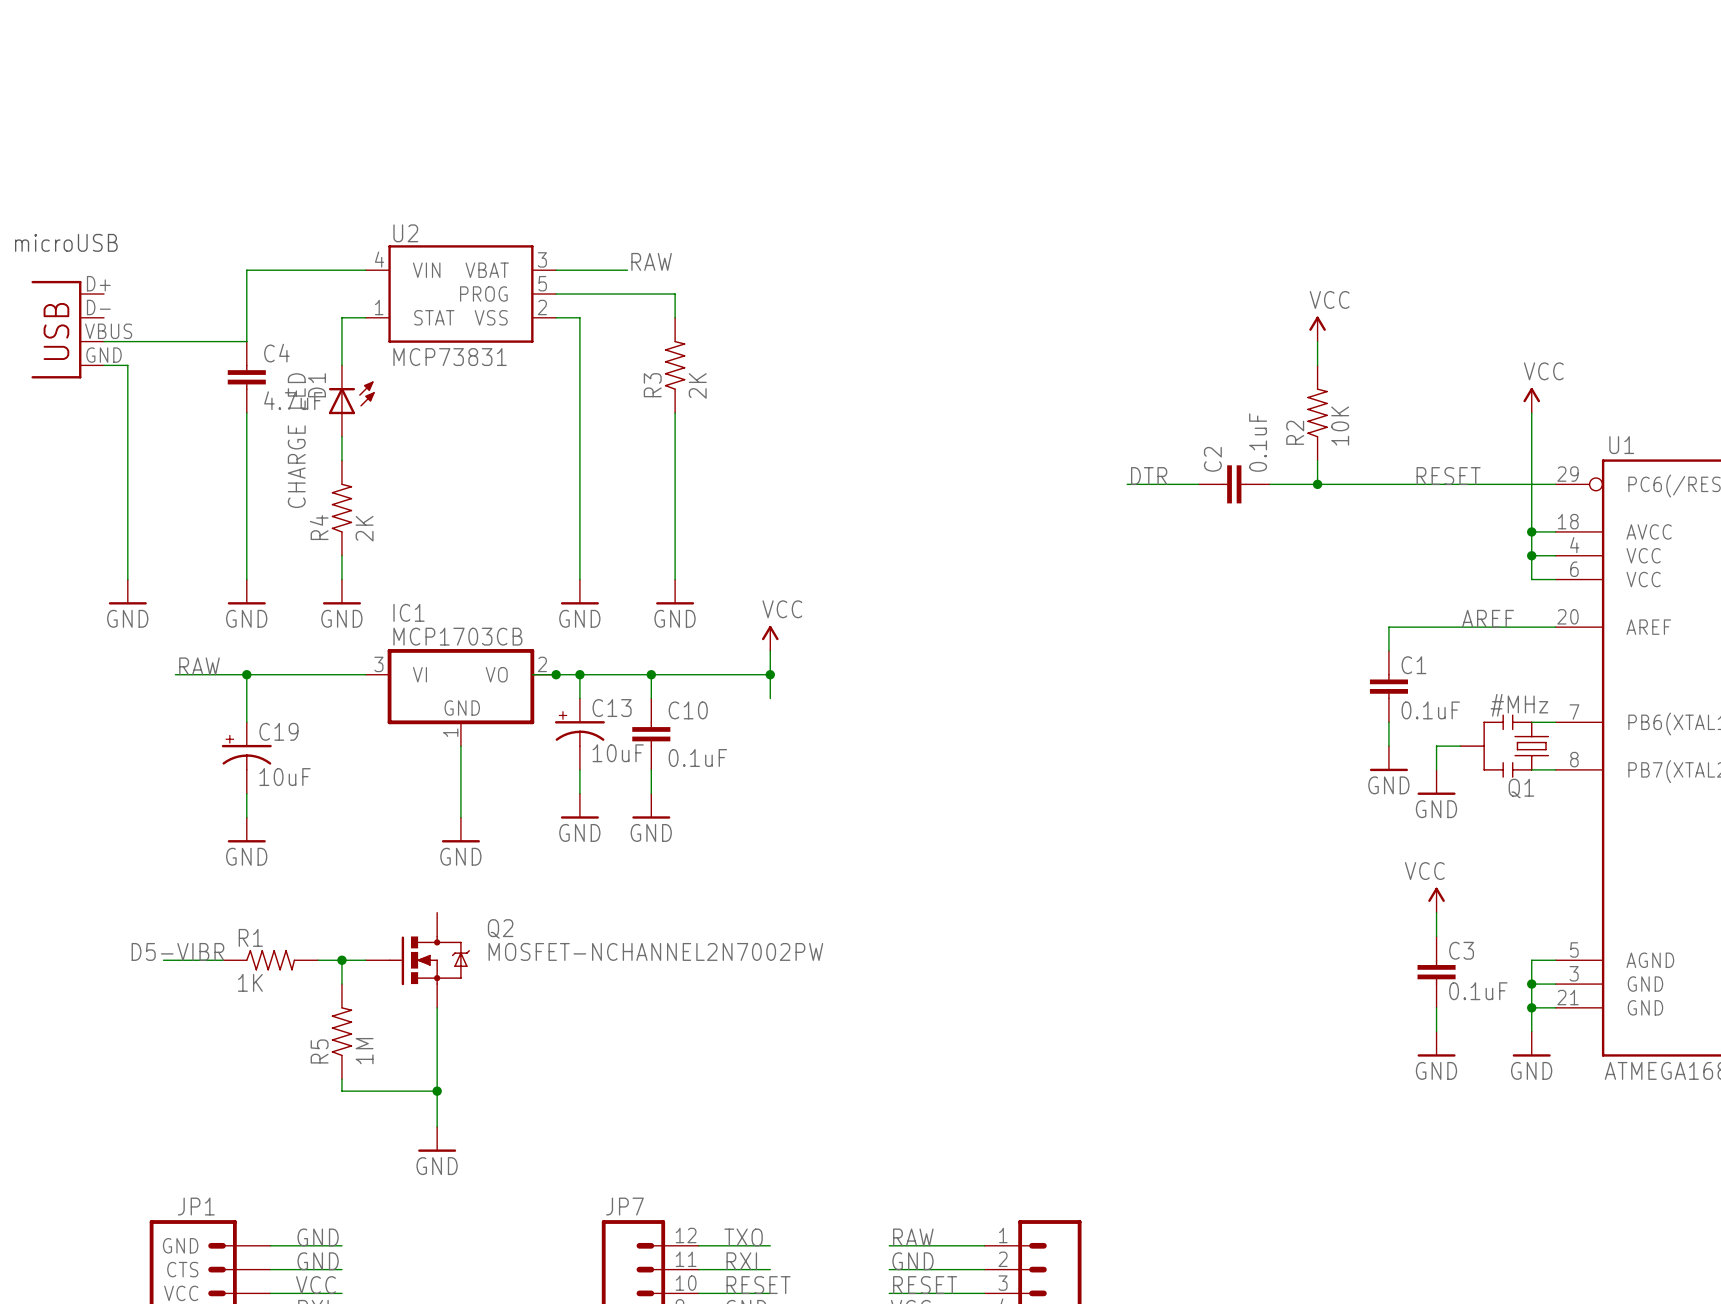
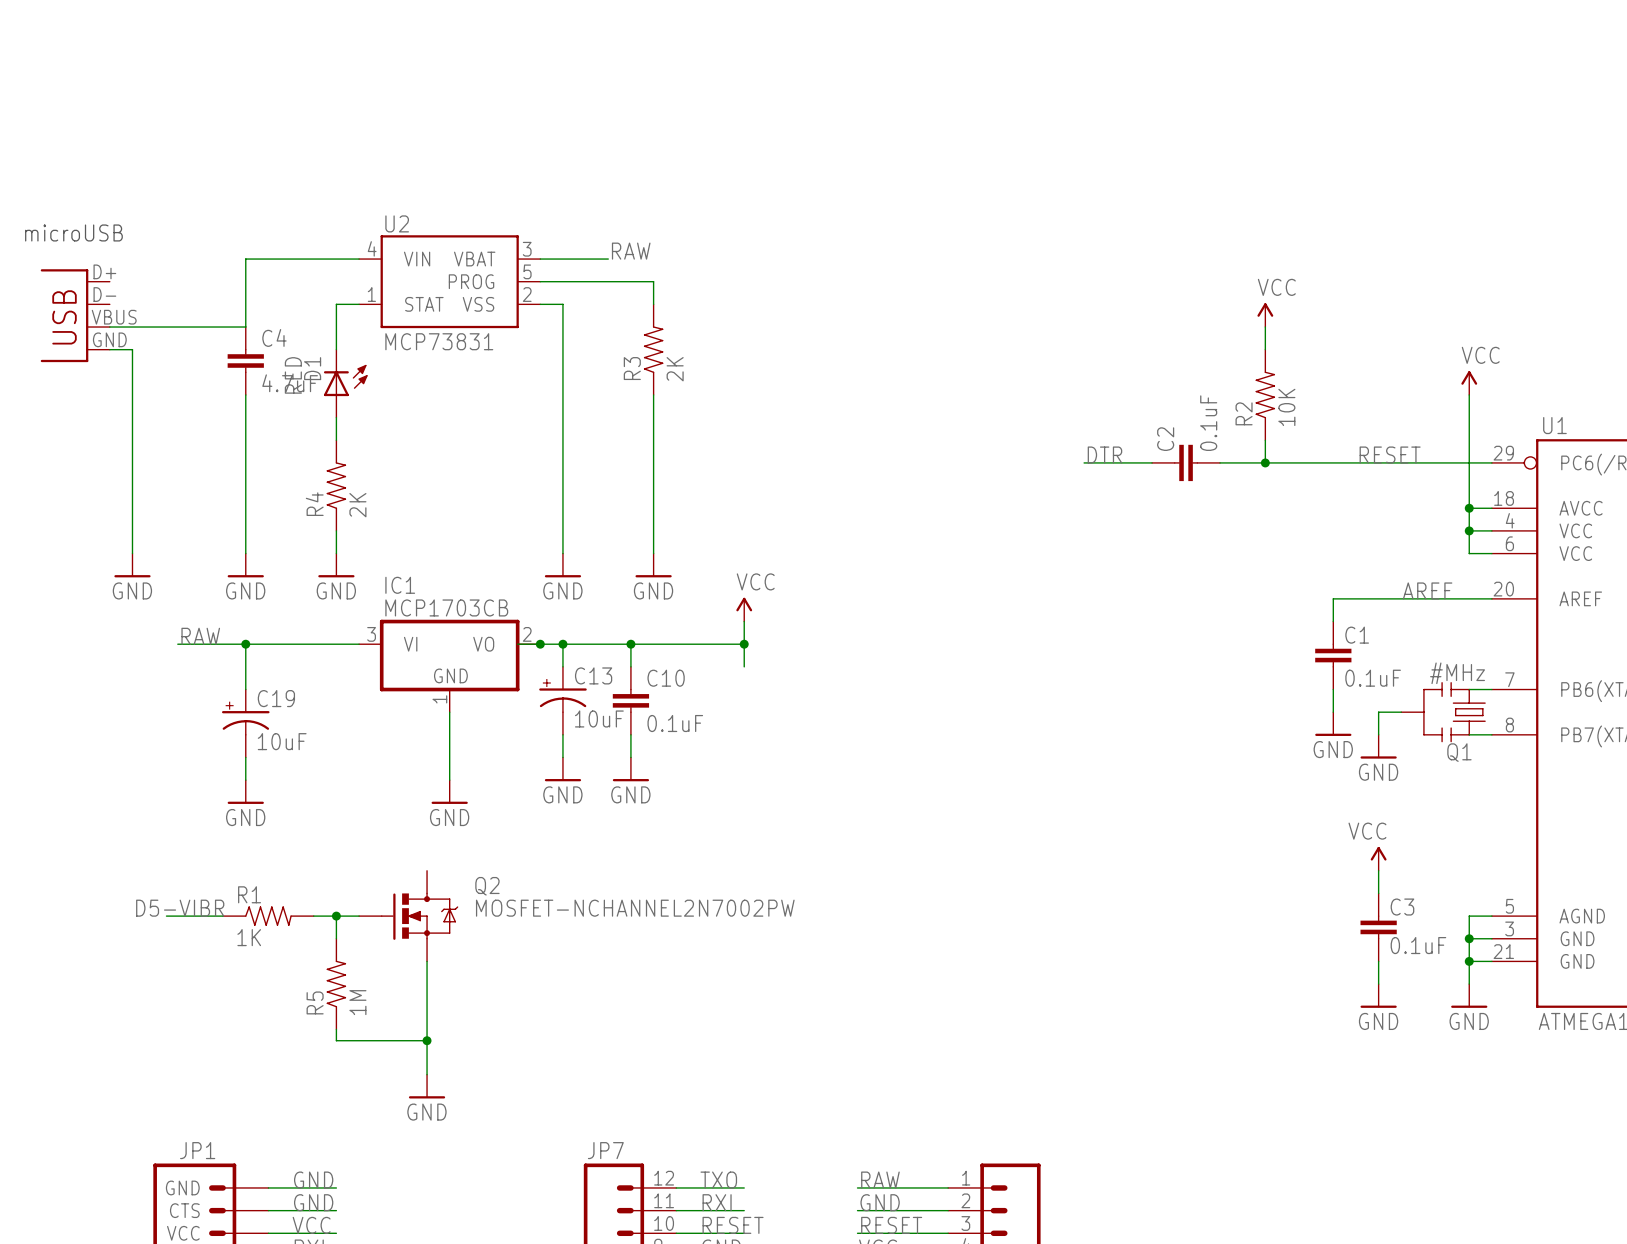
D1 value: CHARGE LED (296, 440) -> RED (293, 375)

